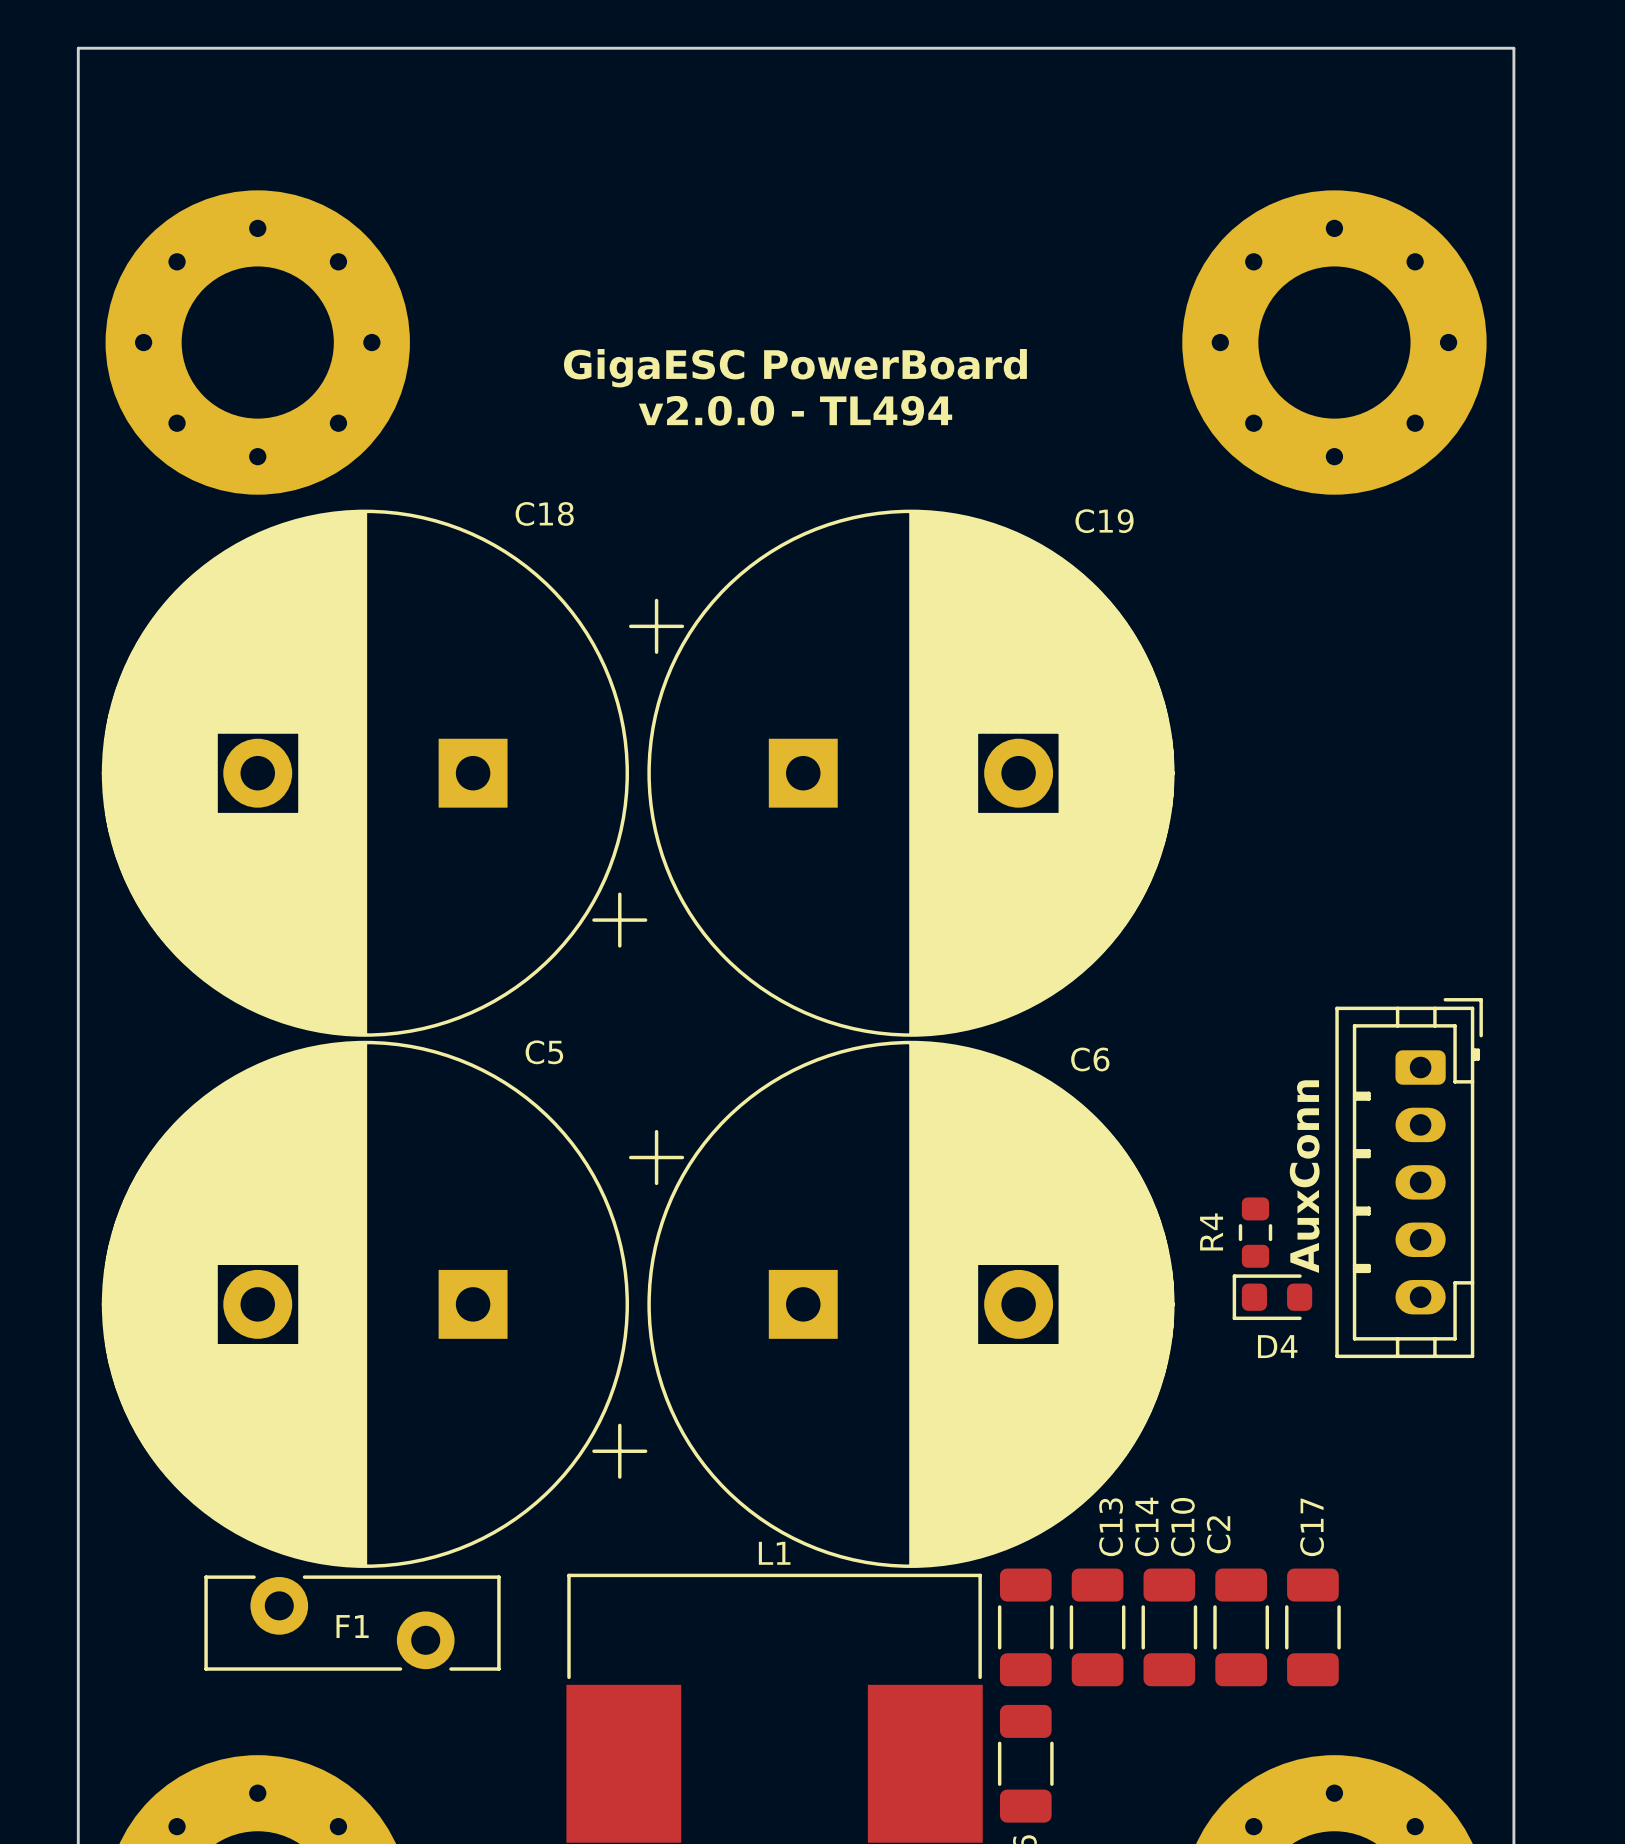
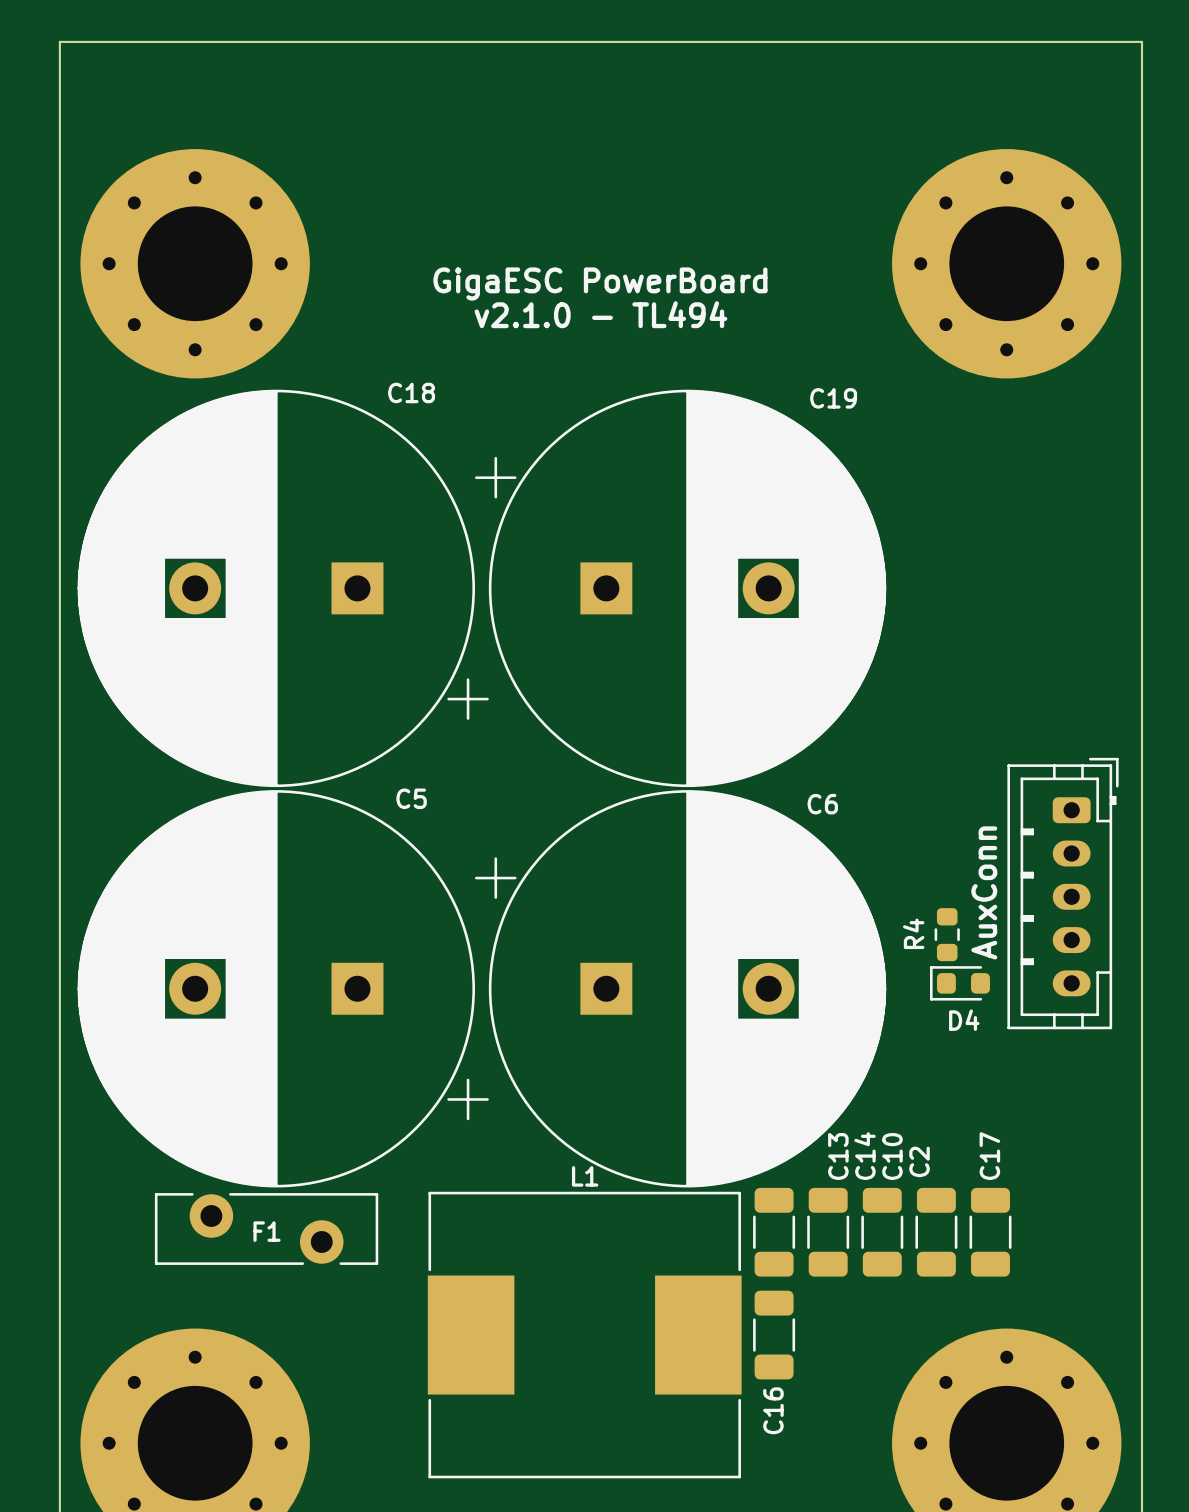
text: v2.0.0 - TL494 (795, 410) -> v2.1.0 - TL494 (600, 314)

